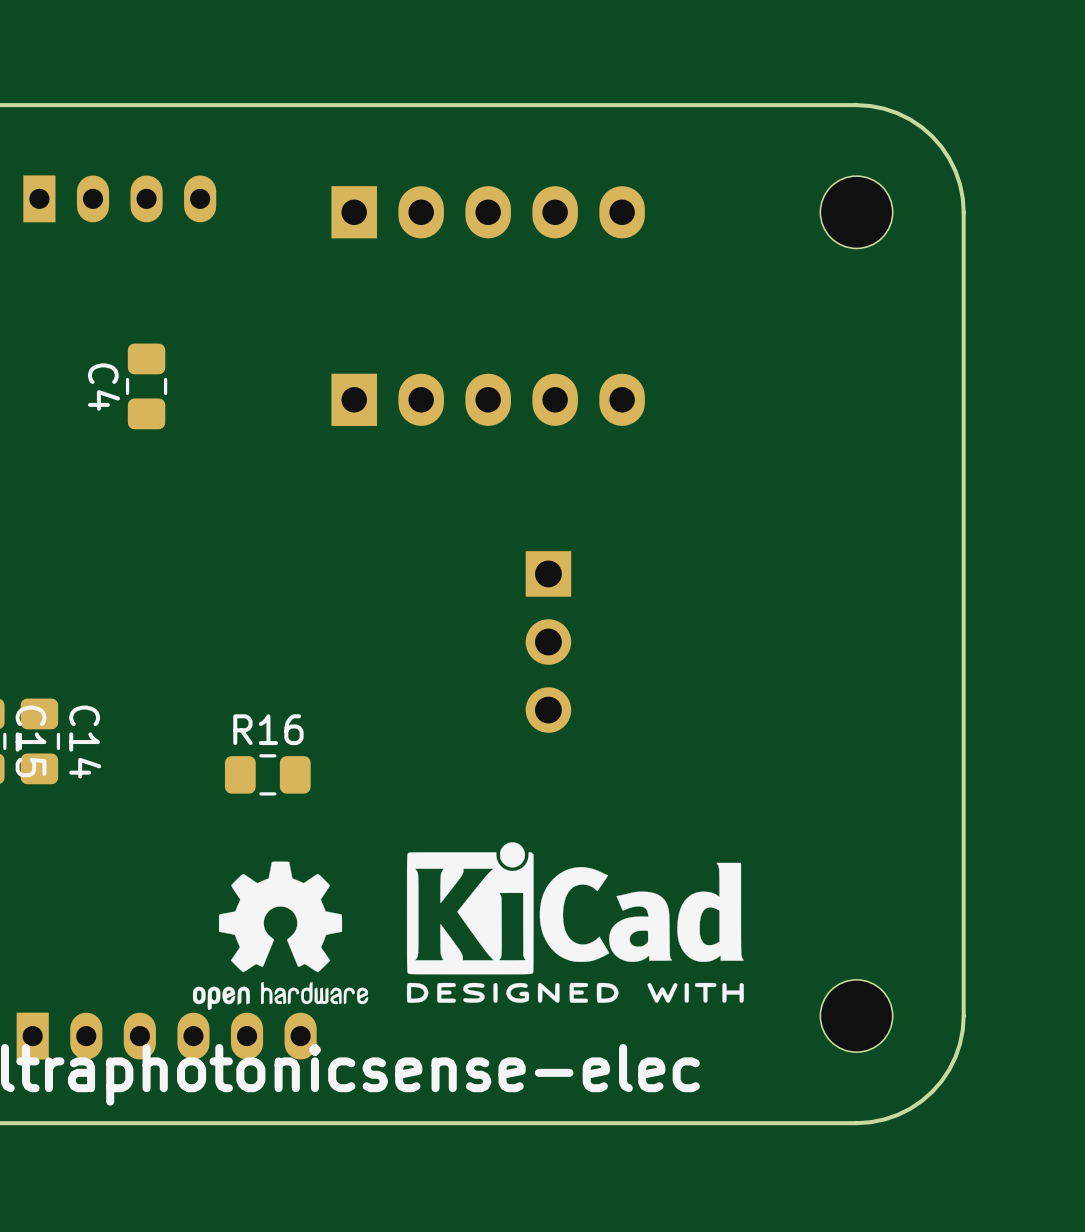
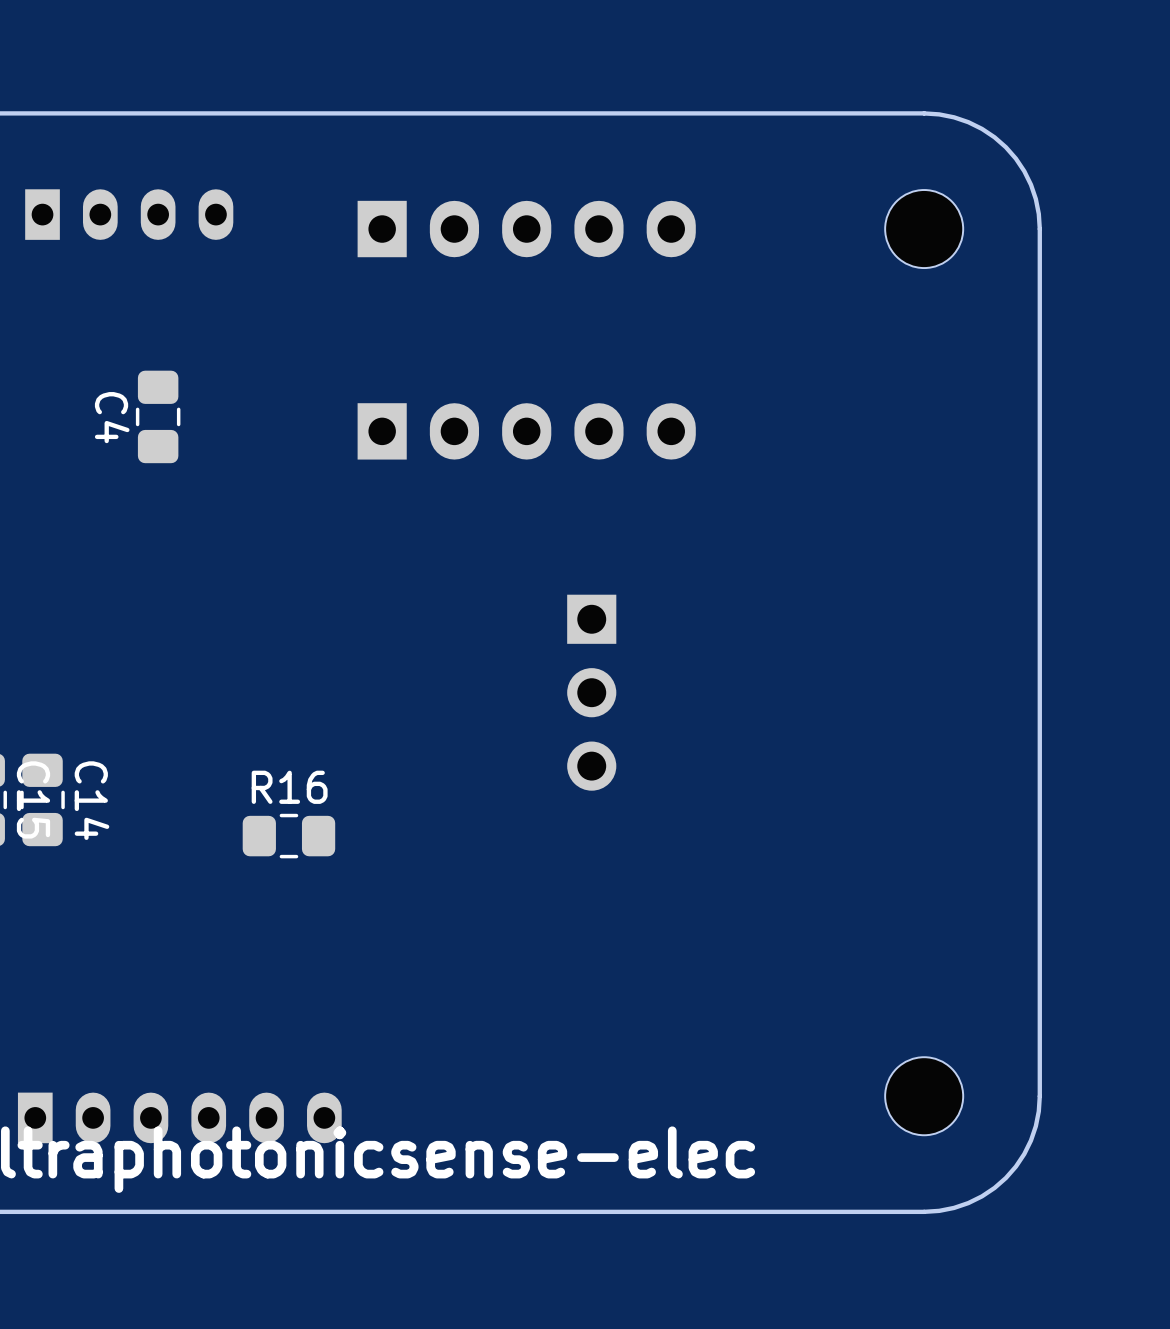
drawing: [406, 842, 744, 1003] -> none
drawing: [192, 861, 369, 1011] -> none

